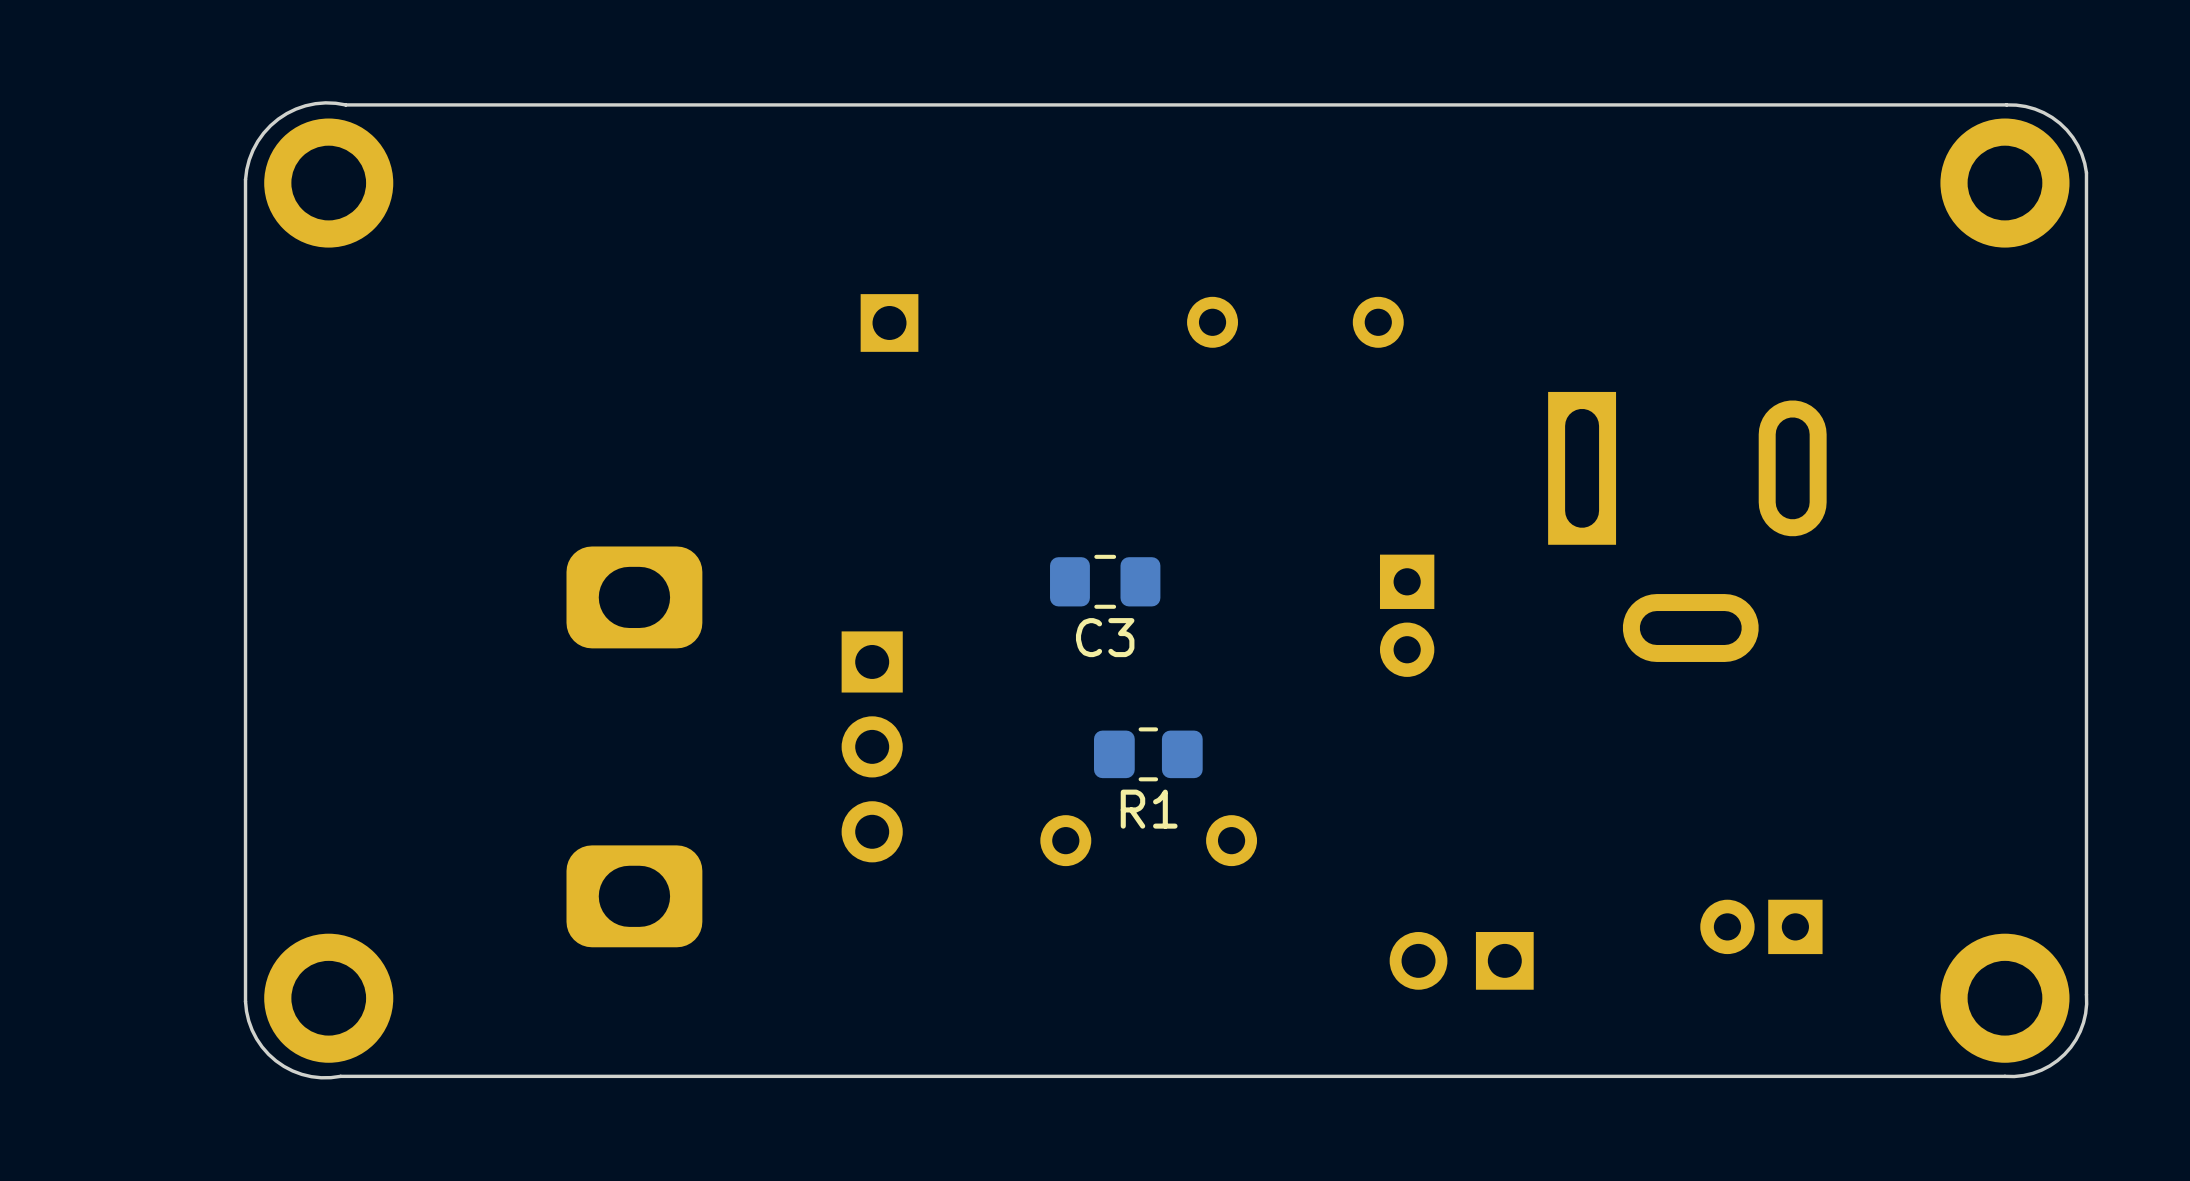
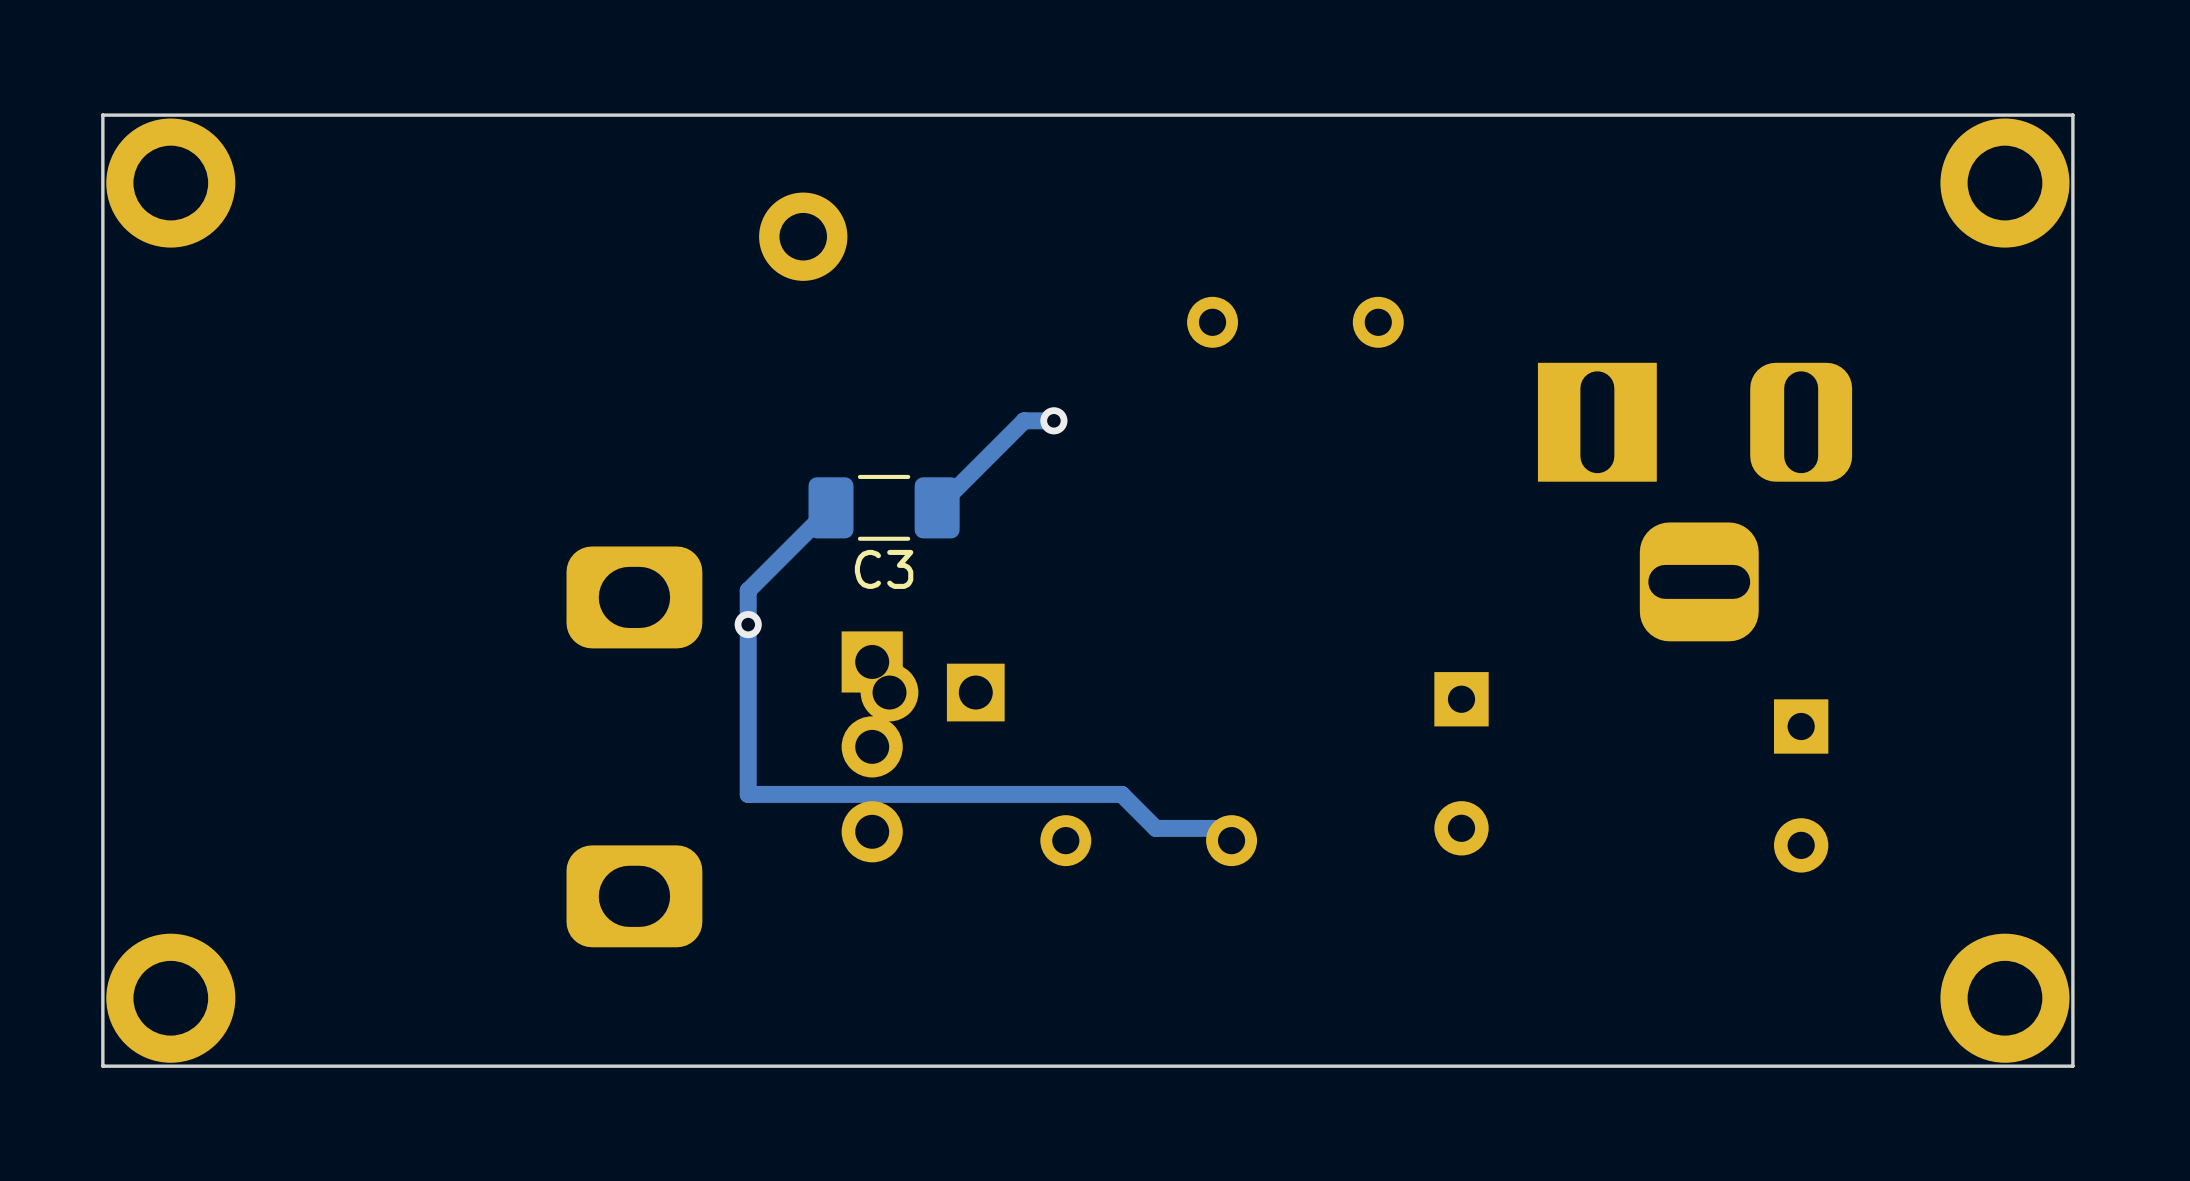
board edge: (2006, 104) (345, 104) (325, 102) (305, 105) (286, 113) (270, 125) (257, 141) (249, 159) (245, 179) (245, 1001) (248, 1020) (256, 1038) (268, 1054) (283, 1066) (301, 1074) (321, 1077) (2014, 1076) (2032, 1073) (2049, 1065) (2064, 1054) (2076, 1039) (2083, 1022) (2086, 1004) (2086, 172) (2077, 145) (2059, 123) (2034, 109) (2006, 104) -> (2072, 115) (2072, 1066) (102, 1066) (102, 115) (2072, 115)
part position: (328, 183) -> (170, 183)
part: none -> (803, 236)
part: (889, 322) -> none
part footprint: [1548, 391, 1827, 662] -> [1537, 362, 1853, 642]
track: none -> (1053, 420) (1024, 420) (937, 507)
via: none -> (1053, 420)
track: none -> (831, 507) (748, 590) (748, 794) (1121, 794) (1155, 828) (1223, 828)
C3 footprint: [1050, 554, 1161, 609] -> [808, 474, 960, 541]
part: (1407, 615) -> none
via: none -> (748, 624)
R1: (1148, 754) -> none
part: none -> (1461, 763)
part: none -> (1801, 785)
part: (1761, 926) -> none
part position: (1461, 960) -> (932, 692)
part position: (328, 998) -> (170, 998)

